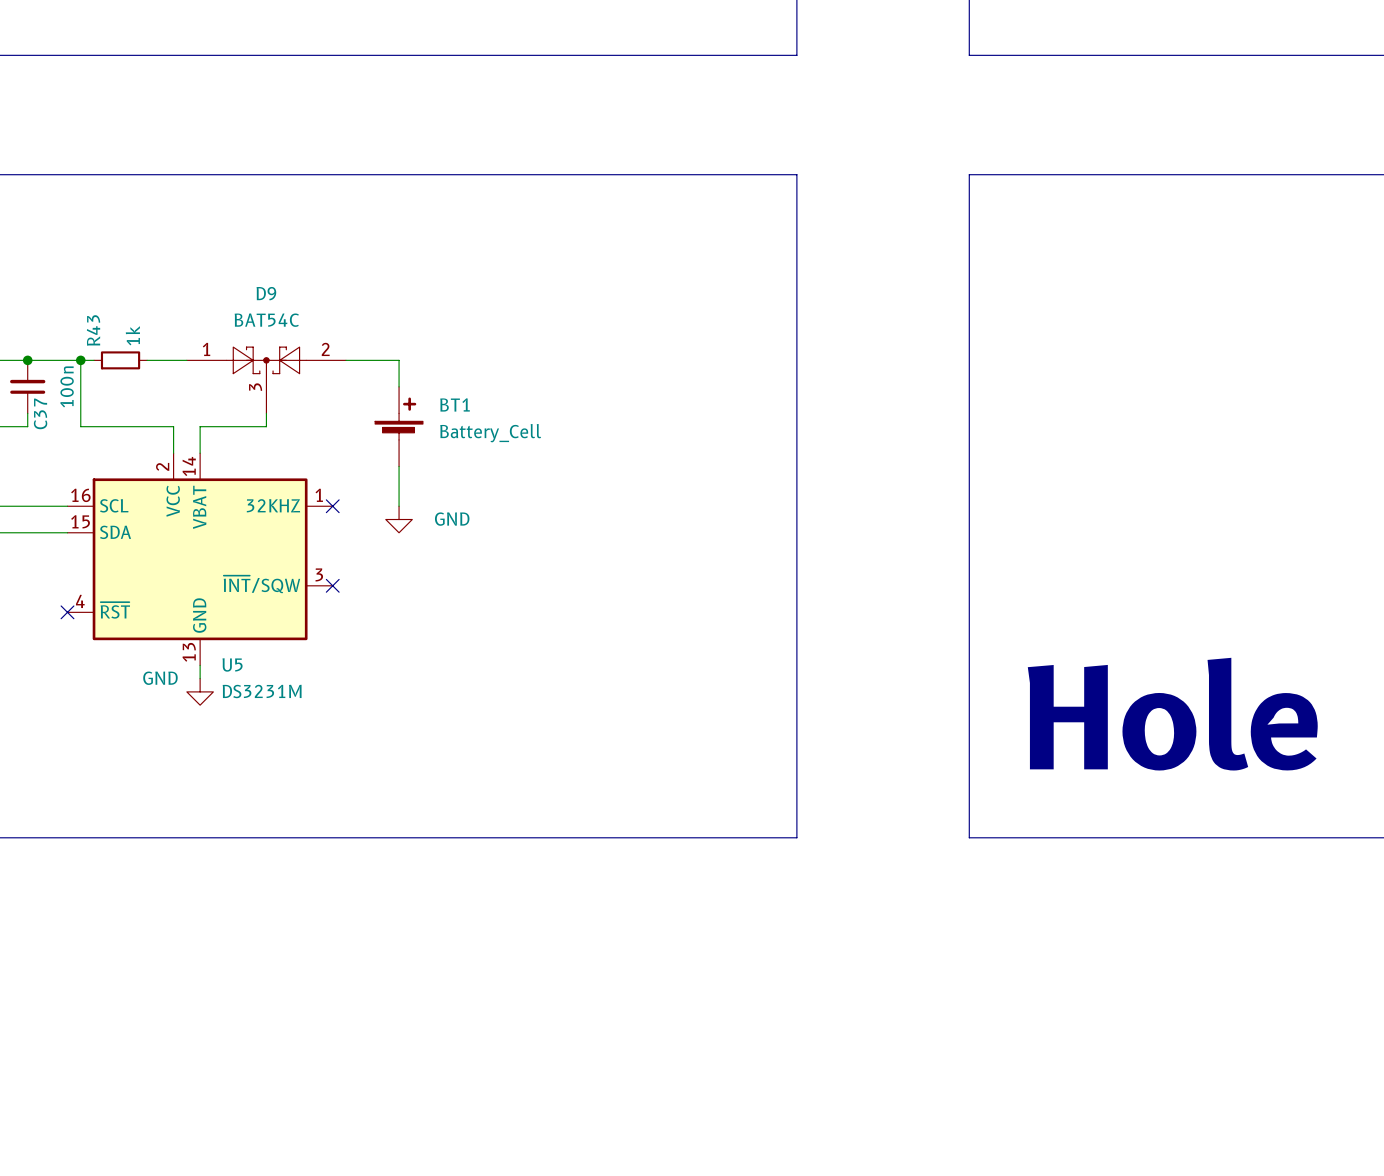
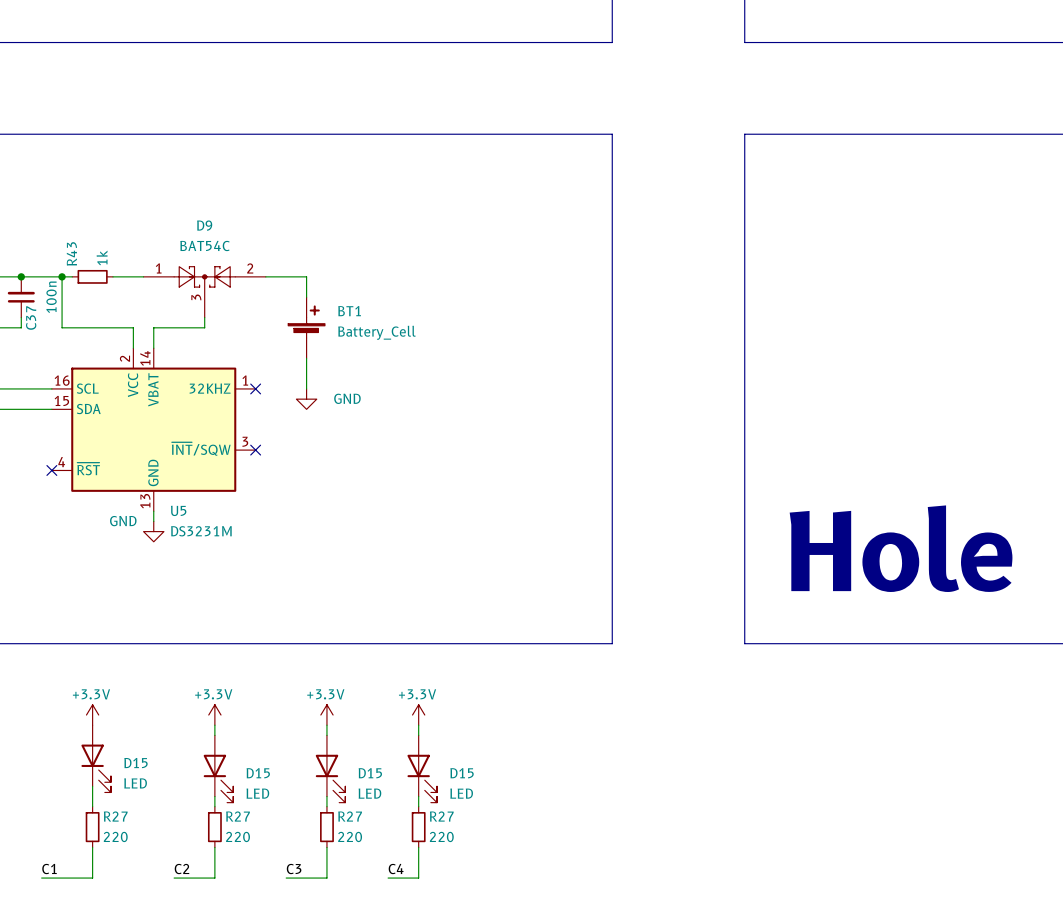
power symbol: none -> +3.3V (92, 715)
power symbol: none -> +3.3V (214, 715)
power symbol: none -> +3.3V (326, 715)
power symbol: none -> +3.3V (418, 715)
wire: none -> (214, 725) (214, 735)
wire: none -> (326, 725) (326, 735)
wire: none -> (418, 725) (418, 735)
D15: none -> LED (96, 758)
D15: none -> LED (218, 769)
D15: none -> LED (330, 769)
D15: none -> LED (422, 769)
wire: none -> (92, 786) (92, 806)
wire: none -> (214, 796) (214, 806)
wire: none -> (326, 796) (326, 806)
wire: none -> (418, 796) (418, 806)
R27: none -> 220 (92, 827)
R27: none -> 220 (214, 827)
R27: none -> 220 (326, 827)
R27: none -> 220 (418, 827)
wire: none -> (92, 847) (92, 878) (41, 878)
wire: none -> (214, 847) (214, 878) (174, 878)
wire: none -> (326, 847) (326, 878) (286, 878)
wire: none -> (418, 847) (418, 878) (388, 878)
label: none -> C1 (49, 869)
label: none -> C2 (181, 869)
label: none -> C3 (294, 869)
label: none -> C4 (396, 869)

